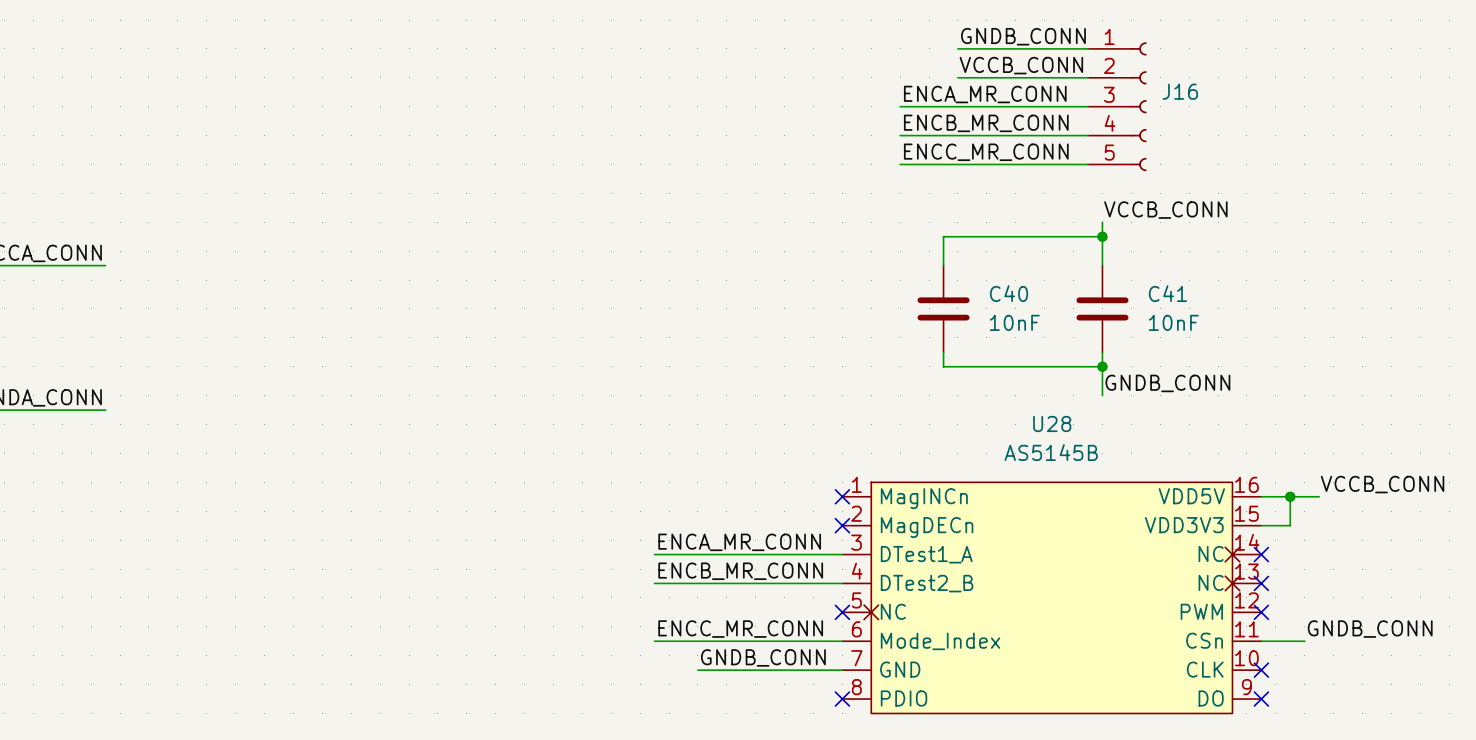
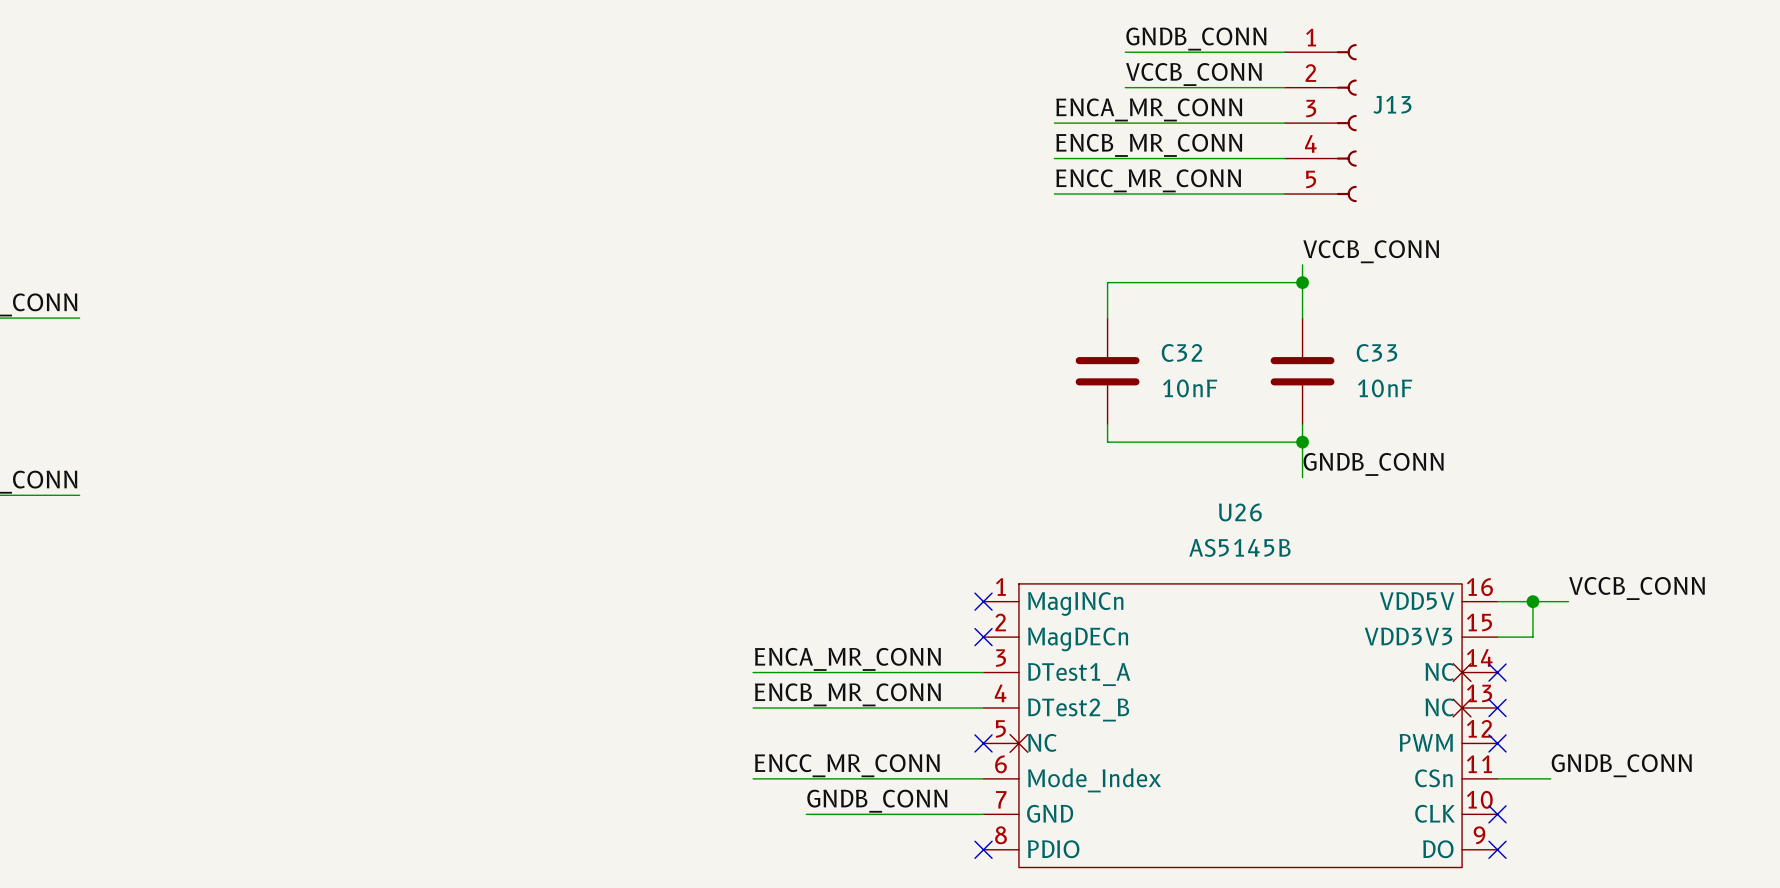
J16 name: J16 (1180, 91) -> J13 (1392, 104)
C40 name: C40 (1009, 293) -> C32 (1182, 352)
C41 name: C41 (1167, 293) -> C33 (1376, 352)
U28: AS5145B (1051, 597) -> none
U26: none -> AS5145B (1240, 725)

